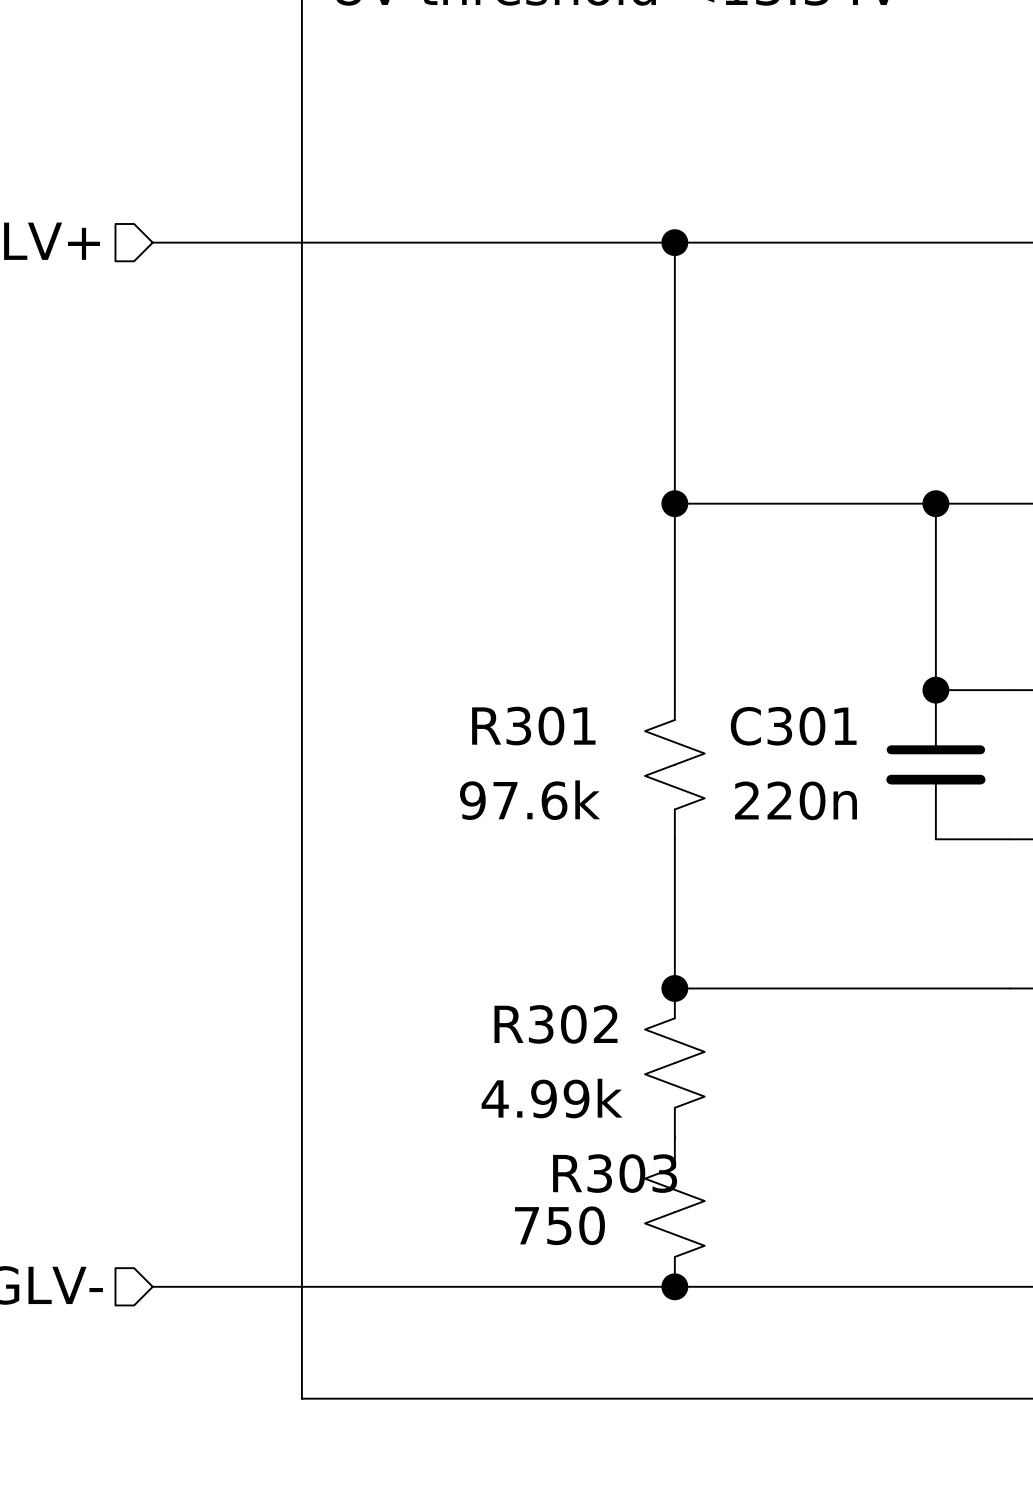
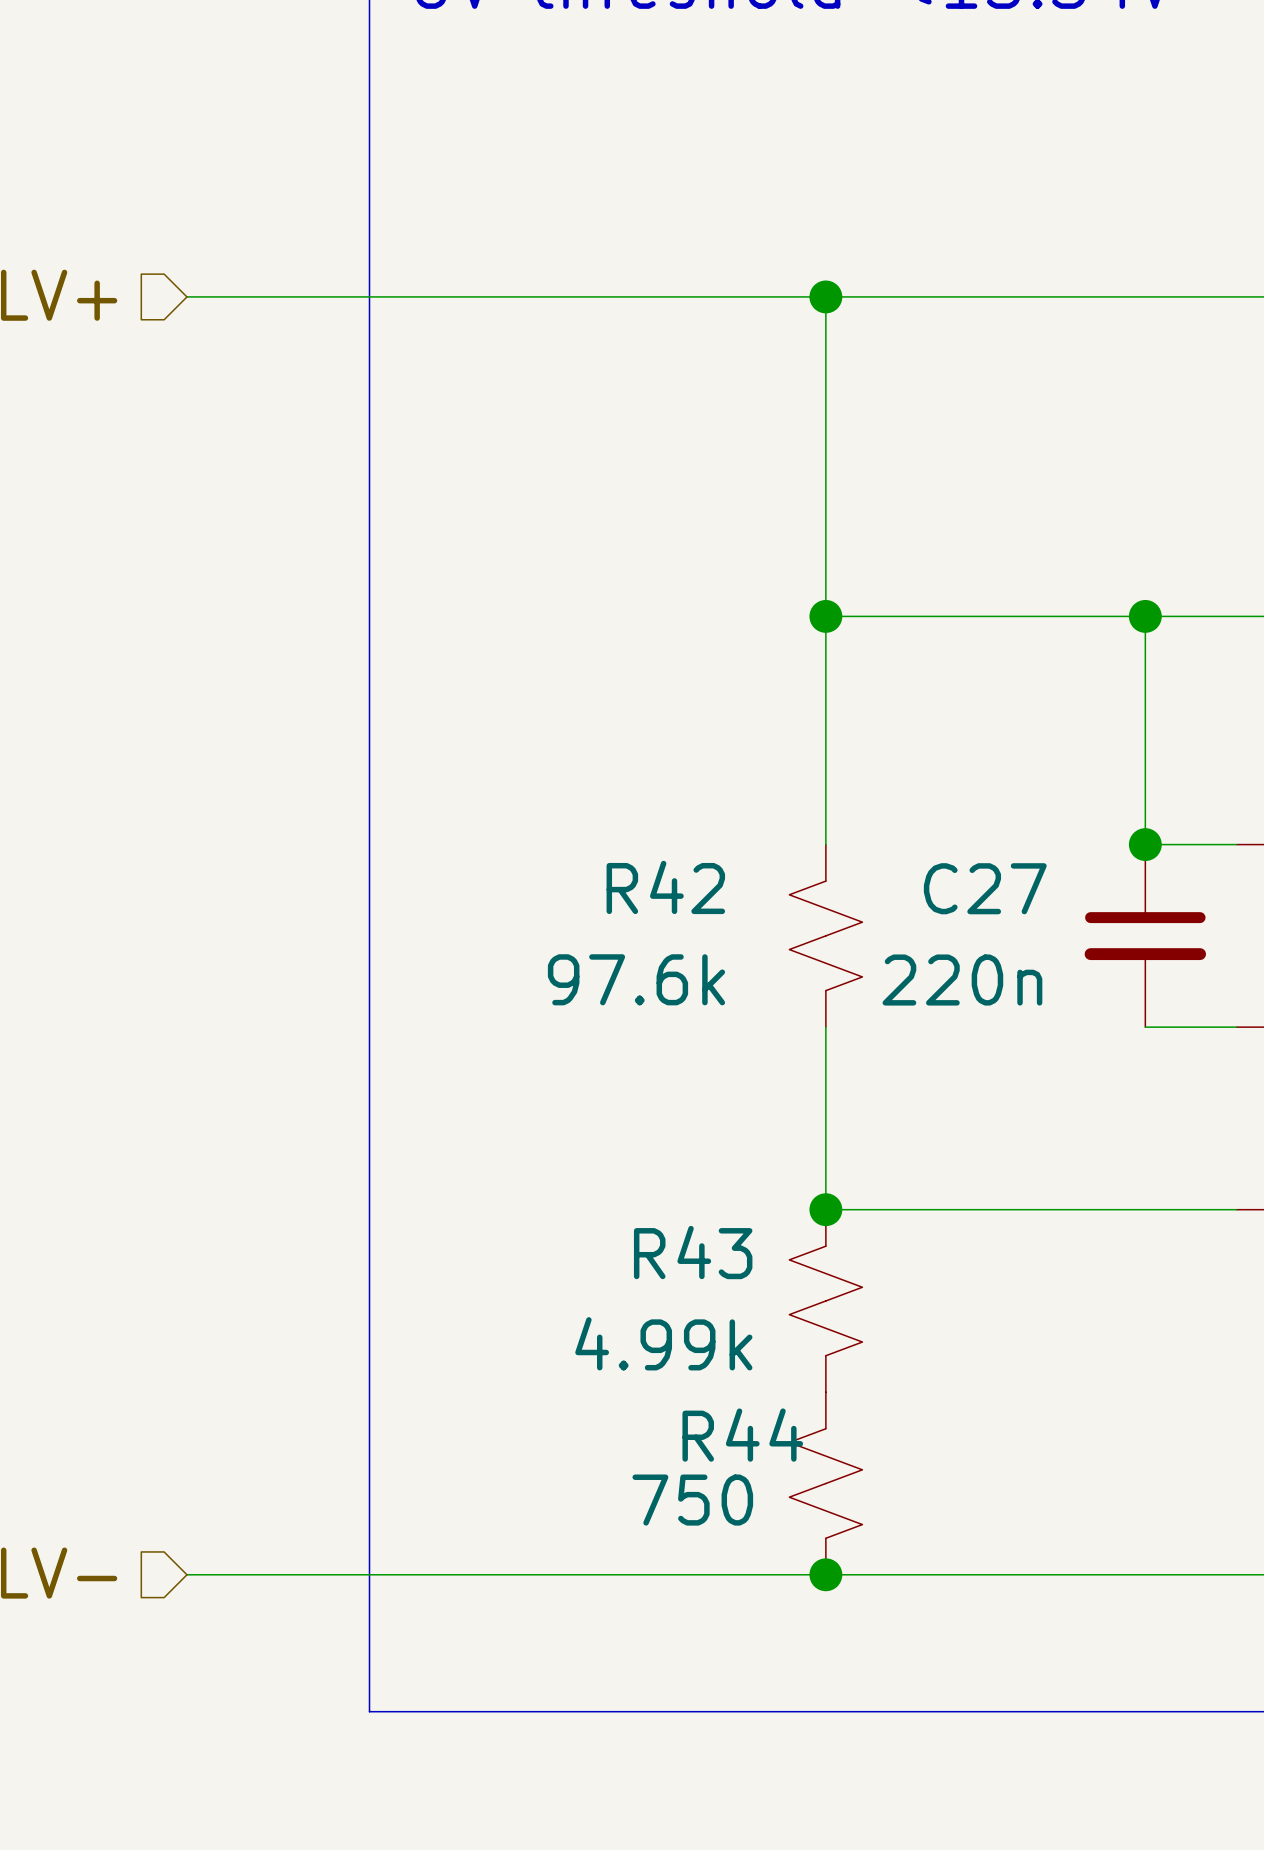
R301 name: R301 (533, 726) -> R42 (665, 887)
C301 name: C301 (793, 726) -> C27 (985, 888)
R302 name: R302 (556, 1024) -> R43 (693, 1252)
R303 name: R303 (615, 1173) -> R44 (742, 1435)

